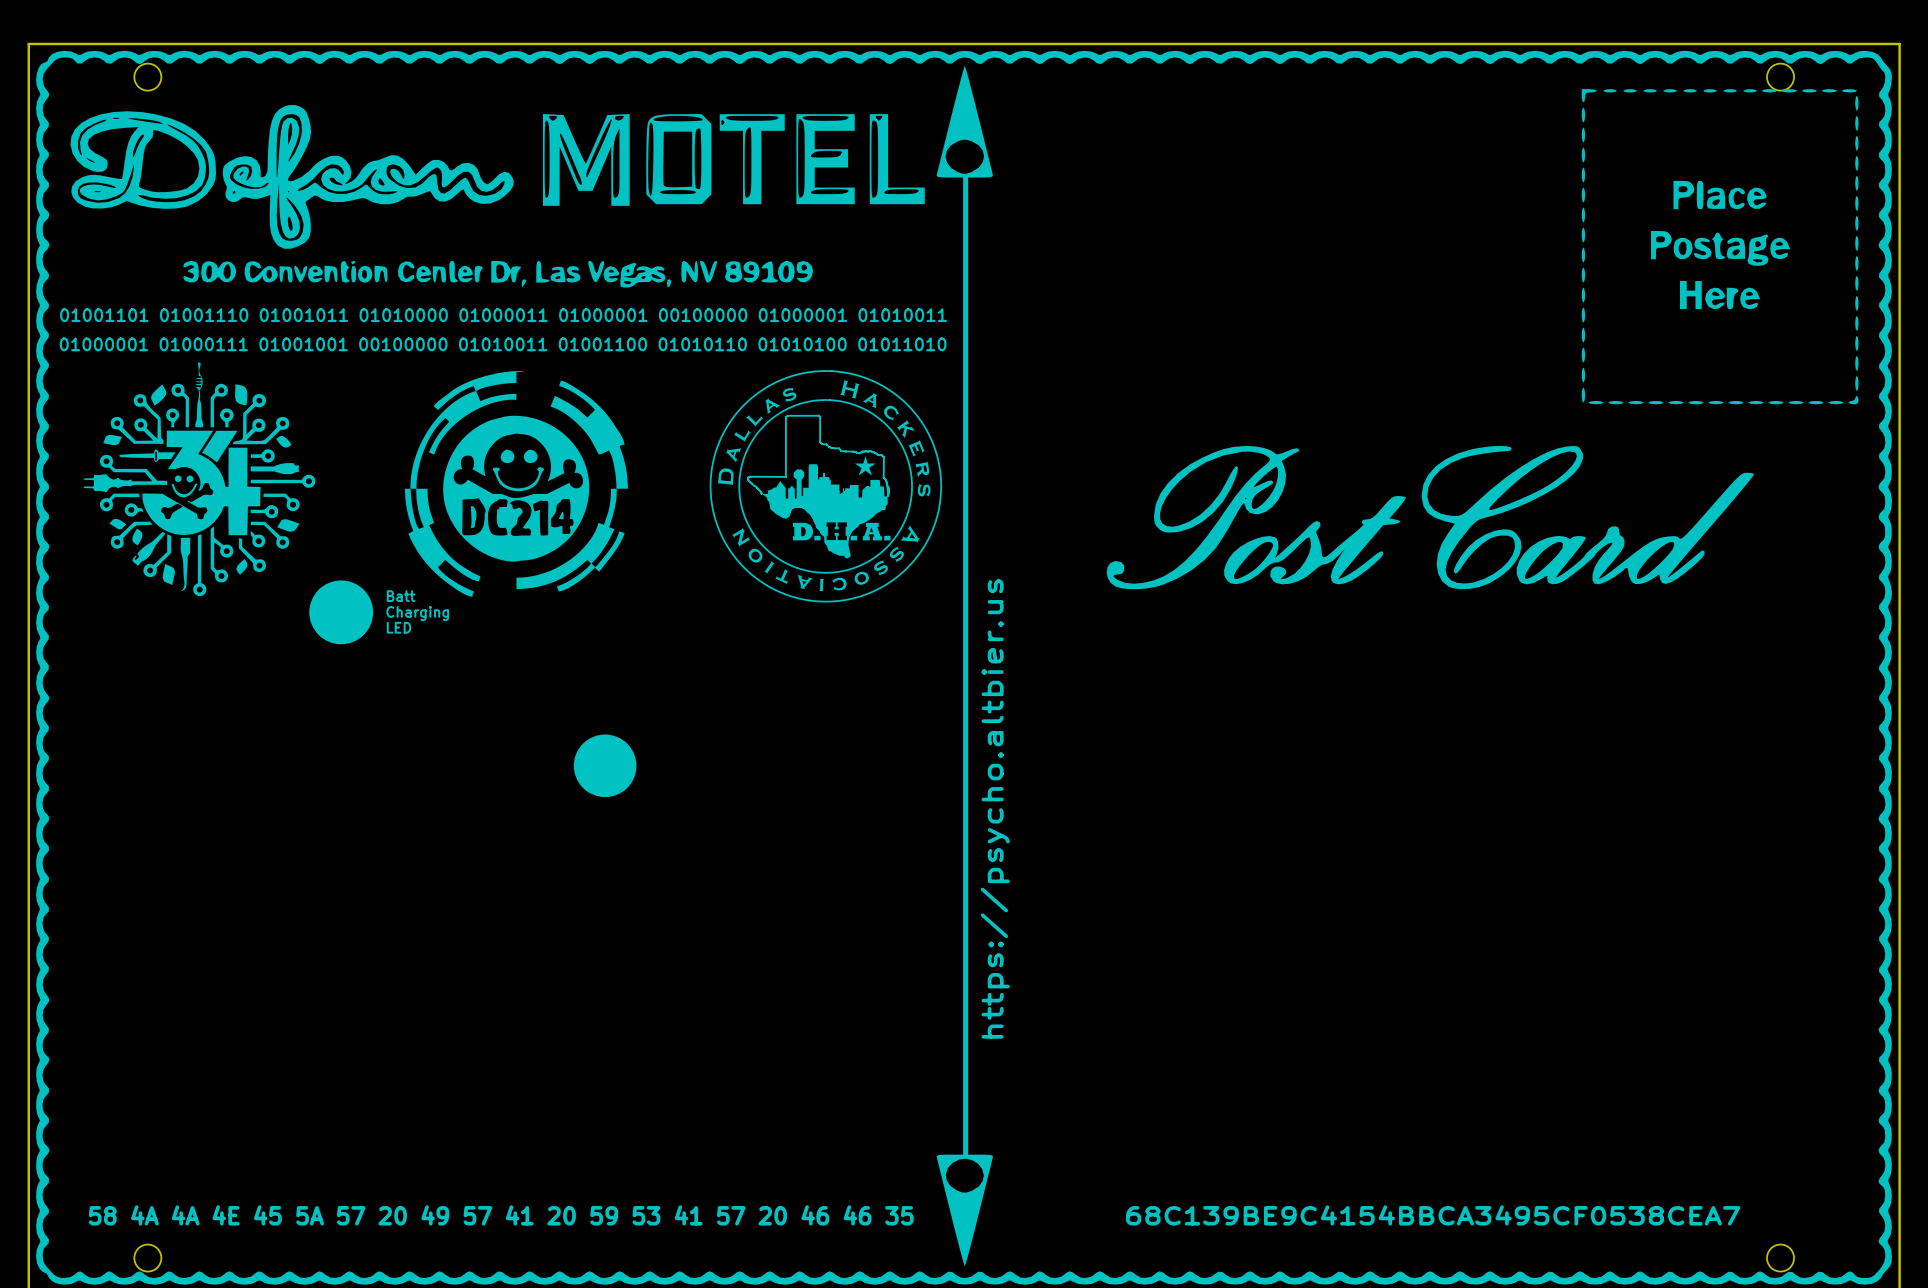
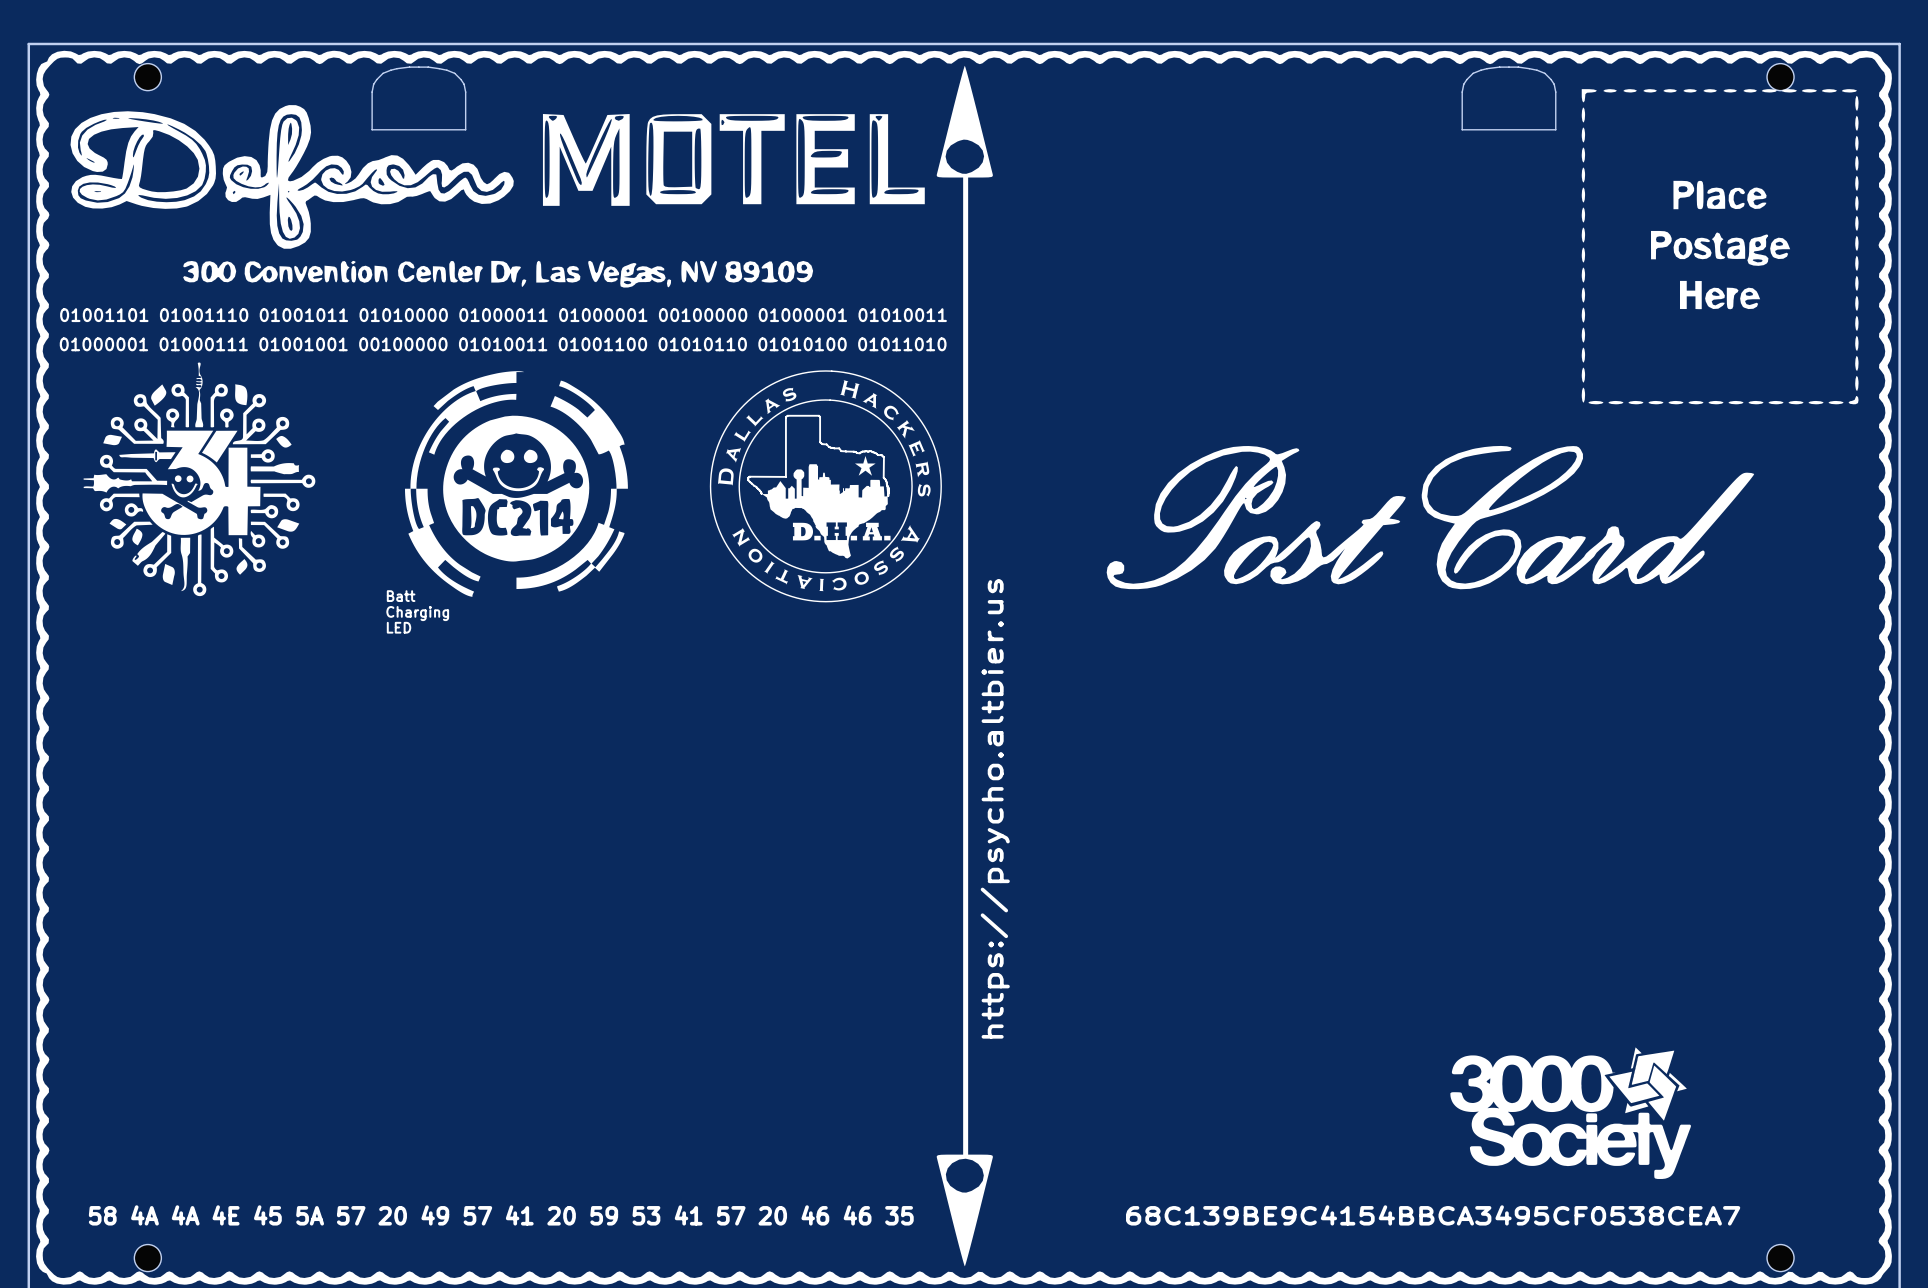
drawing: none -> [371, 66, 466, 131]
drawing: none -> [1461, 66, 1557, 131]
drawing: [309, 580, 374, 645] -> none
drawing: [573, 734, 637, 798] -> none
drawing: none -> [1450, 1047, 1691, 1179]

